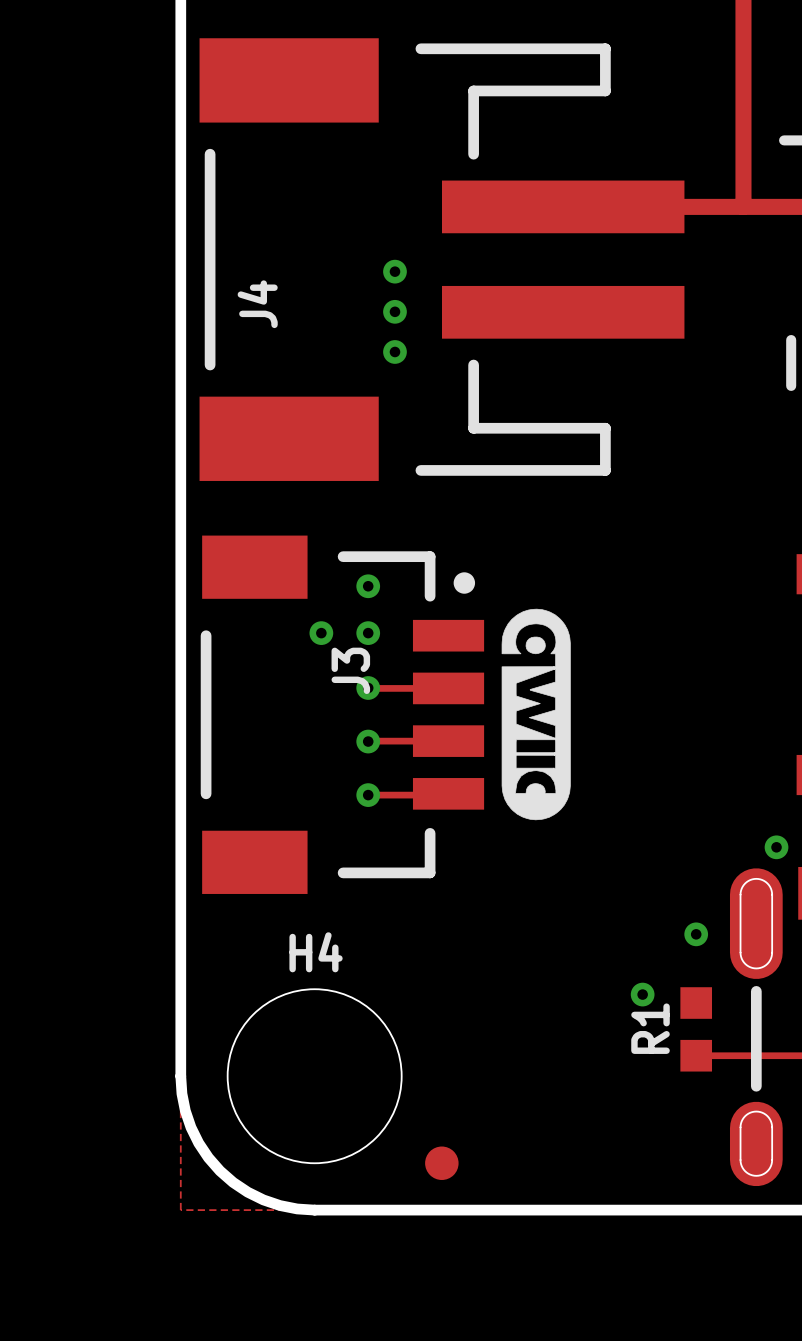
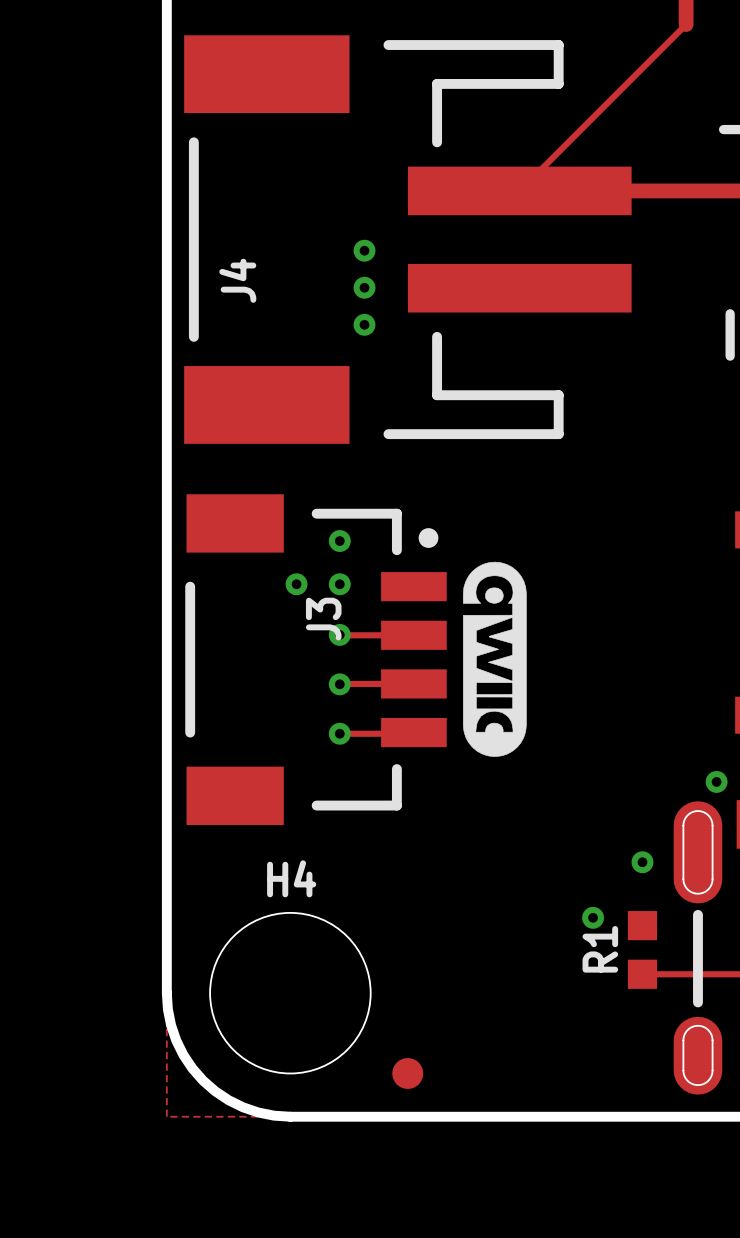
track: (743, 26) (743, 206) -> (686, 24) (519, 190)

